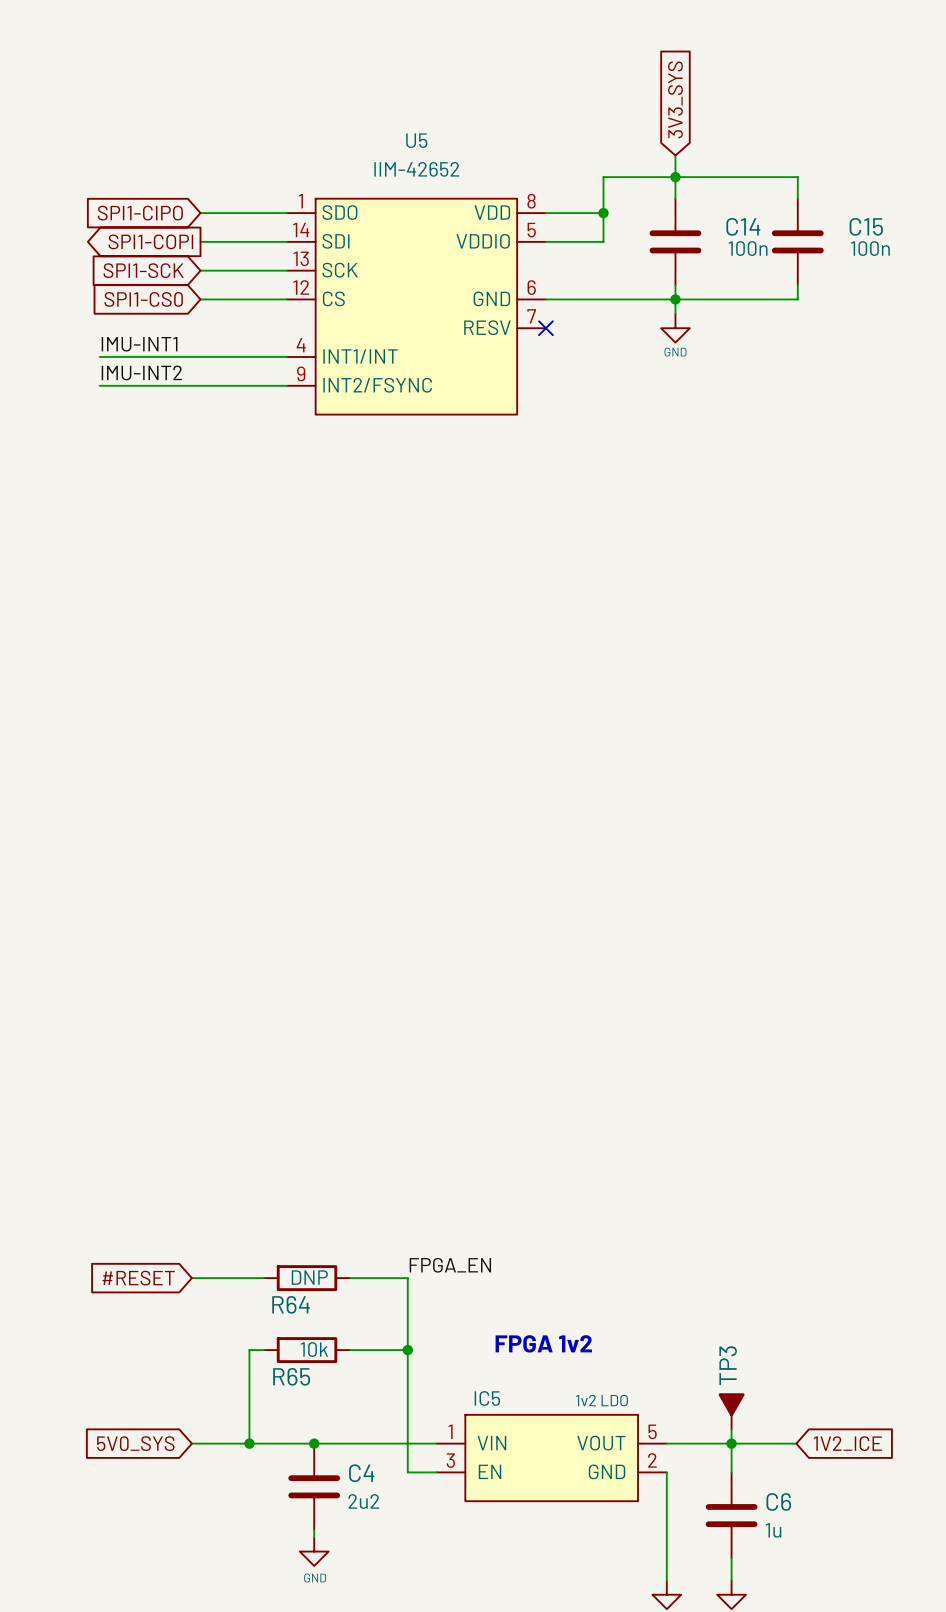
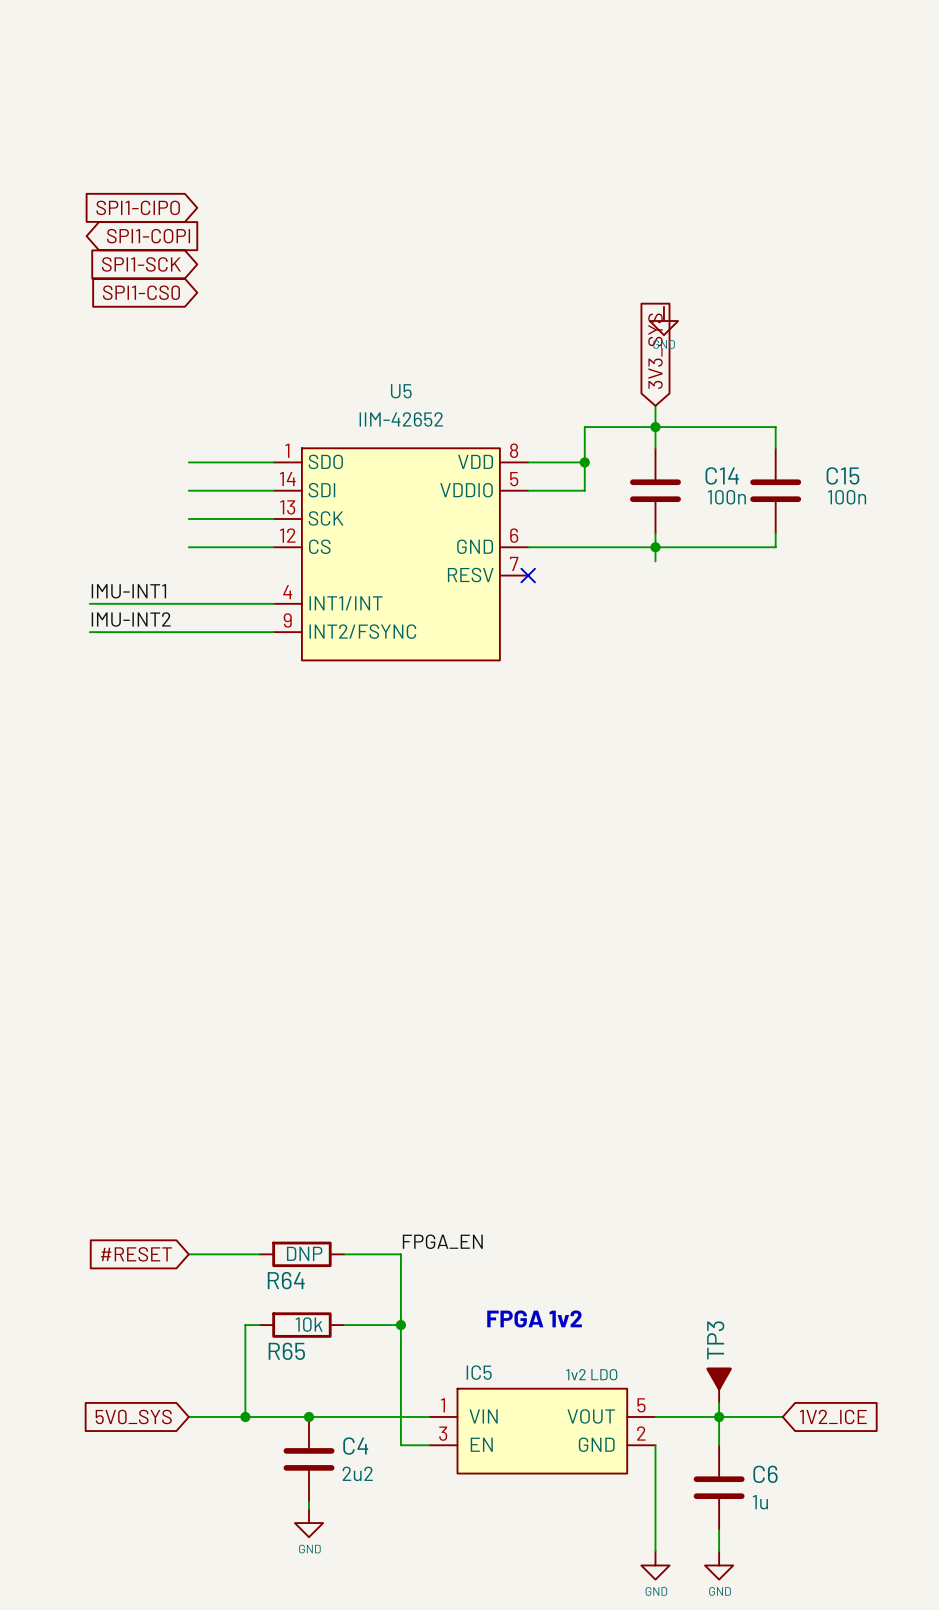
global label position: 3V3_SYS (675, 99) -> 3V3_SYS (655, 351)
wire: (675, 155) (675, 198) -> (655, 405) (655, 448)
junction: (675, 177) -> none
wire: (797, 198) (797, 177) (603, 177) (603, 241) (545, 241) -> (775, 448) (775, 427) (584, 427) (584, 490) (528, 490)
wire: (200, 213) (286, 213) -> (188, 462) (273, 462)
wire: (545, 213) (603, 213) -> (528, 462) (584, 462)
junction: (603, 213) -> none
wire: (200, 241) (286, 241) -> (188, 490) (273, 490)
C14 position: (675, 241) -> (655, 490)
C15 position: (797, 241) -> (775, 490)
wire: (200, 270) (286, 270) -> (188, 518) (273, 518)
wire: (675, 285) (675, 313) -> (655, 533) (655, 561)
wire: (797, 285) (797, 299) (545, 299) -> (775, 533) (775, 547) (528, 547)
wire: (200, 299) (286, 299) -> (188, 547) (273, 547)
junction: (675, 299) -> none
U5 position: (416, 306) -> (400, 554)
no-connect mark: (545, 328) -> none
label position: IMU-INT1 (139, 344) -> IMU-INT1 (128, 591)
wire: (99, 357) (286, 357) -> (89, 603) (273, 603)
label position: IMU-INT2 (141, 372) -> IMU-INT2 (131, 619)
wire: (99, 385) (286, 385) -> (89, 632) (273, 632)
junction: none -> (655, 427)
junction: none -> (584, 462)
junction: none -> (655, 547)
no-connect mark: none -> (528, 575)

